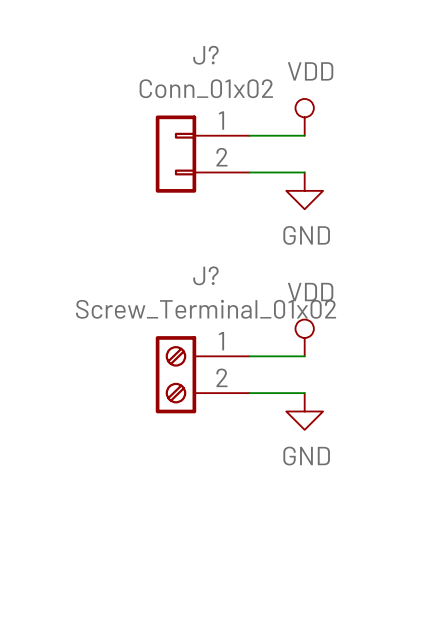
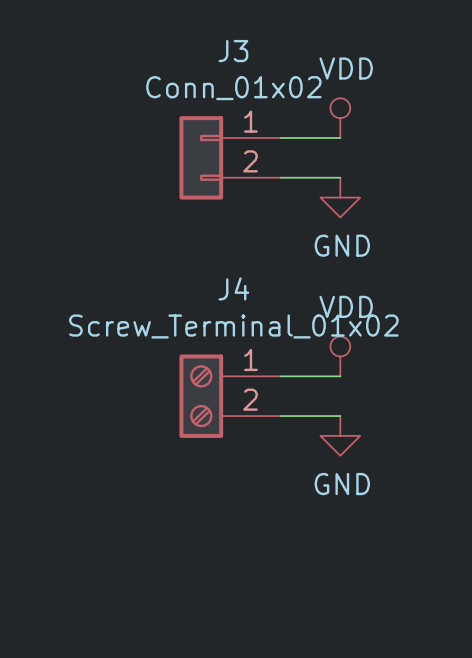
J? name: J? (205, 55) -> J3 (233, 51)
J? name: J? (205, 275) -> J4 (233, 288)

